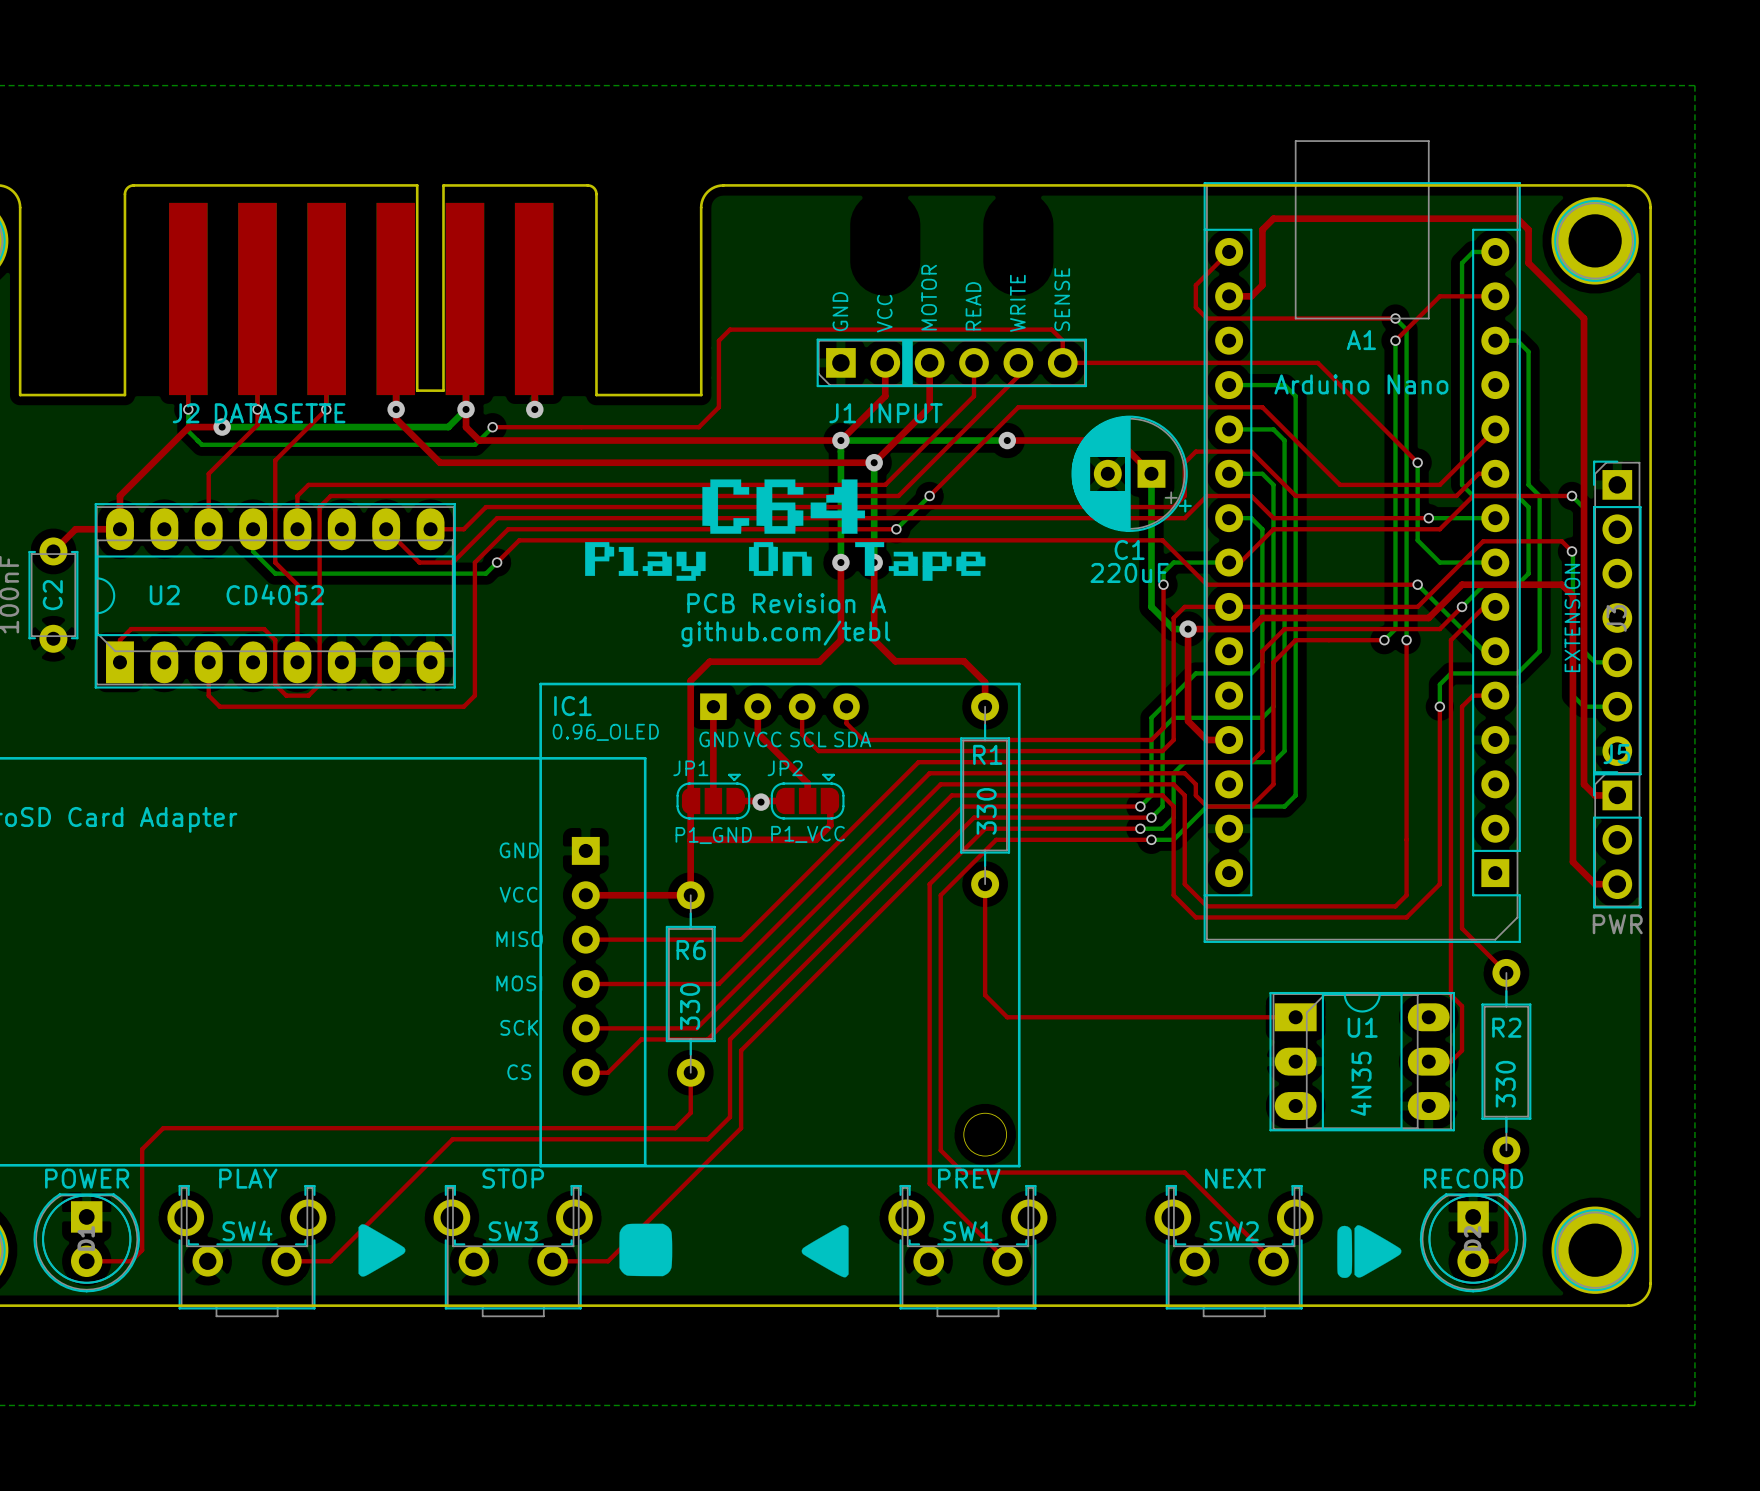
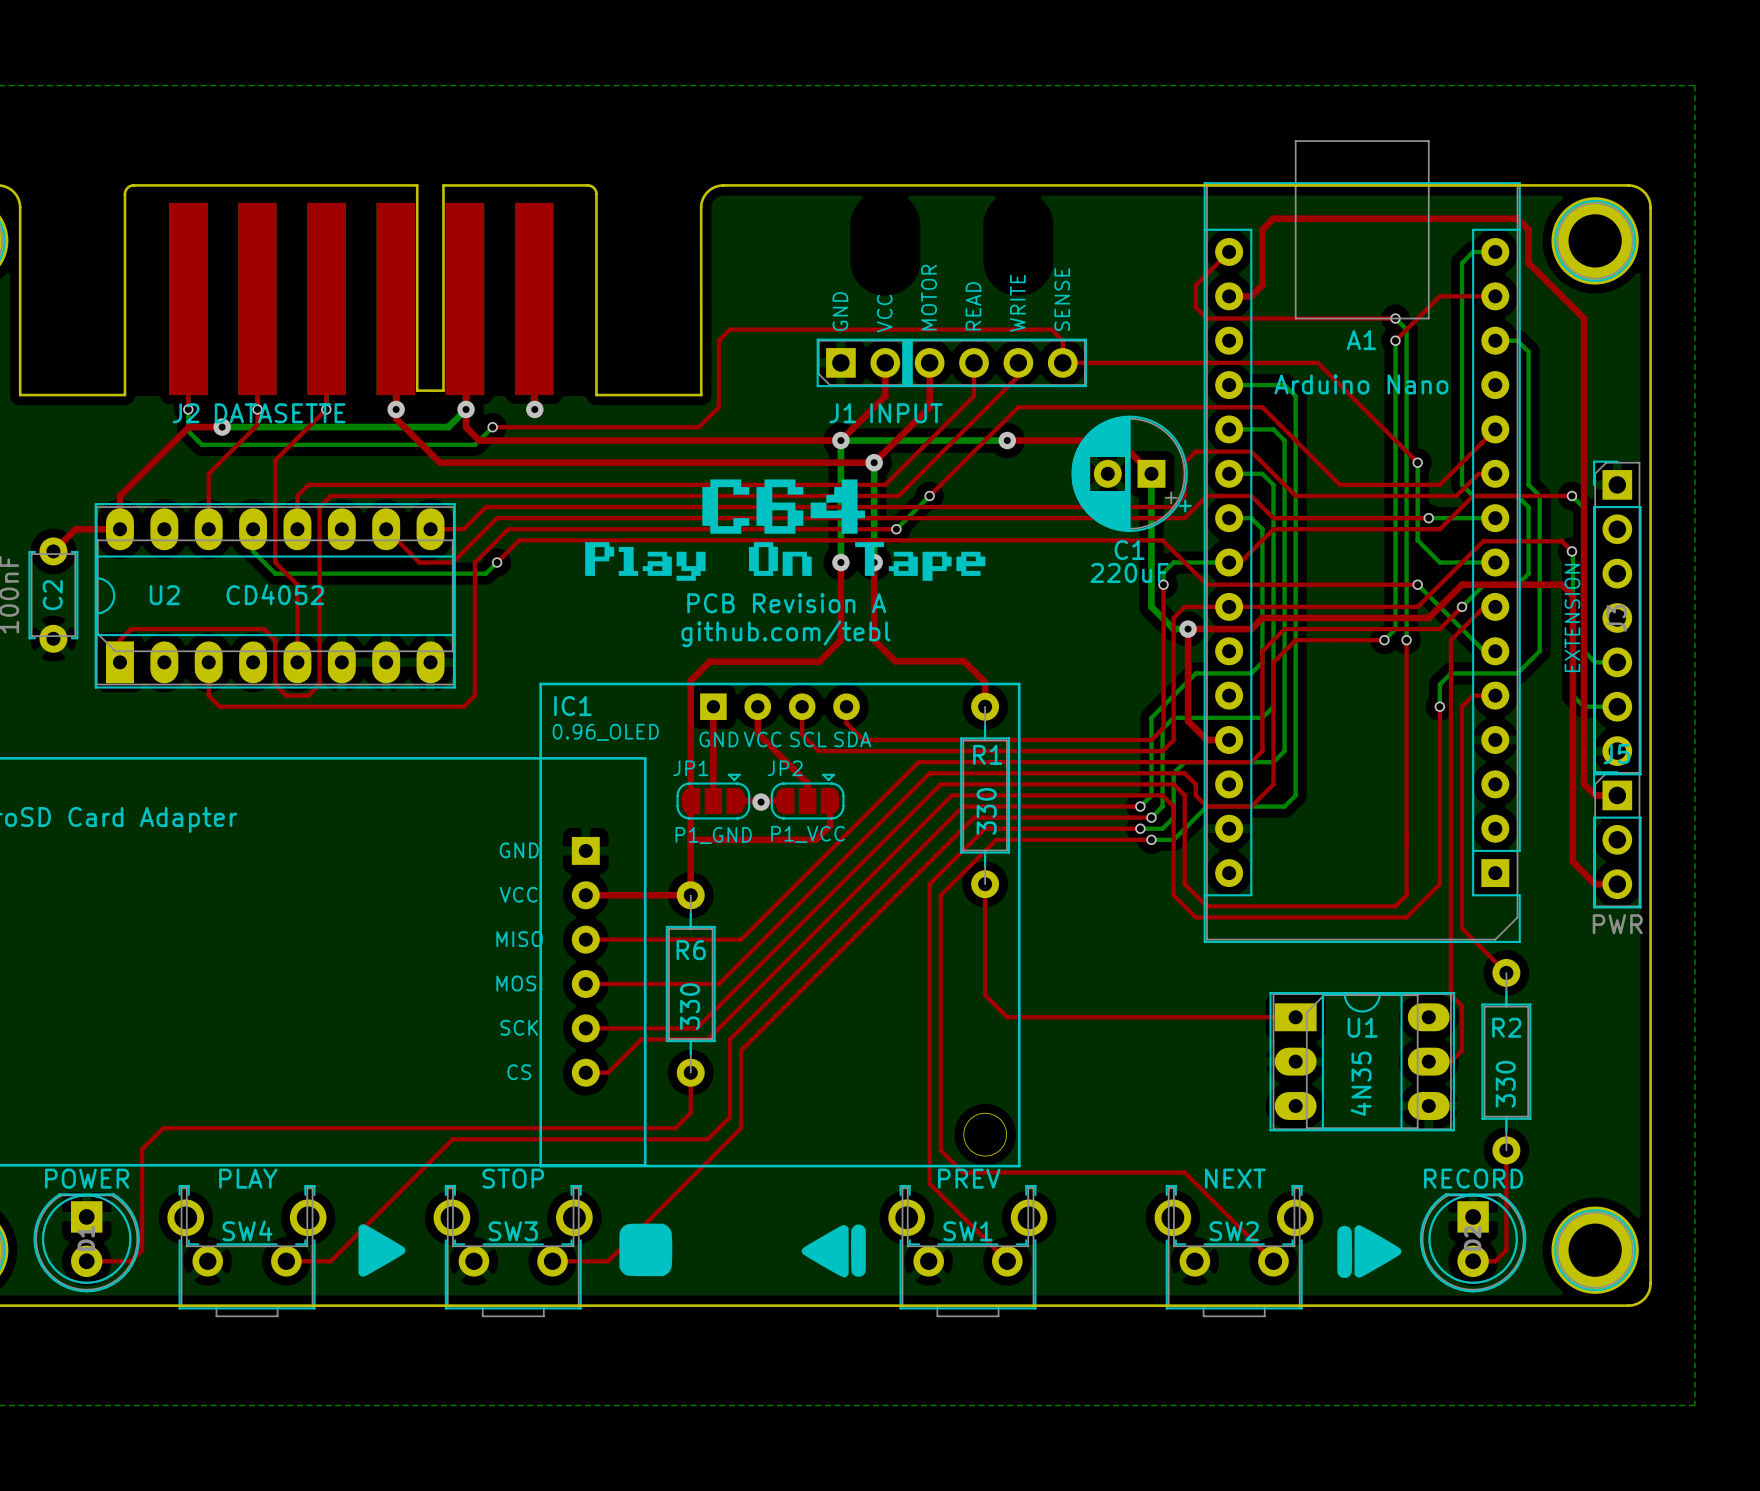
drawing shape: [801, 1225, 849, 1278] -> [801, 1224, 866, 1278]

